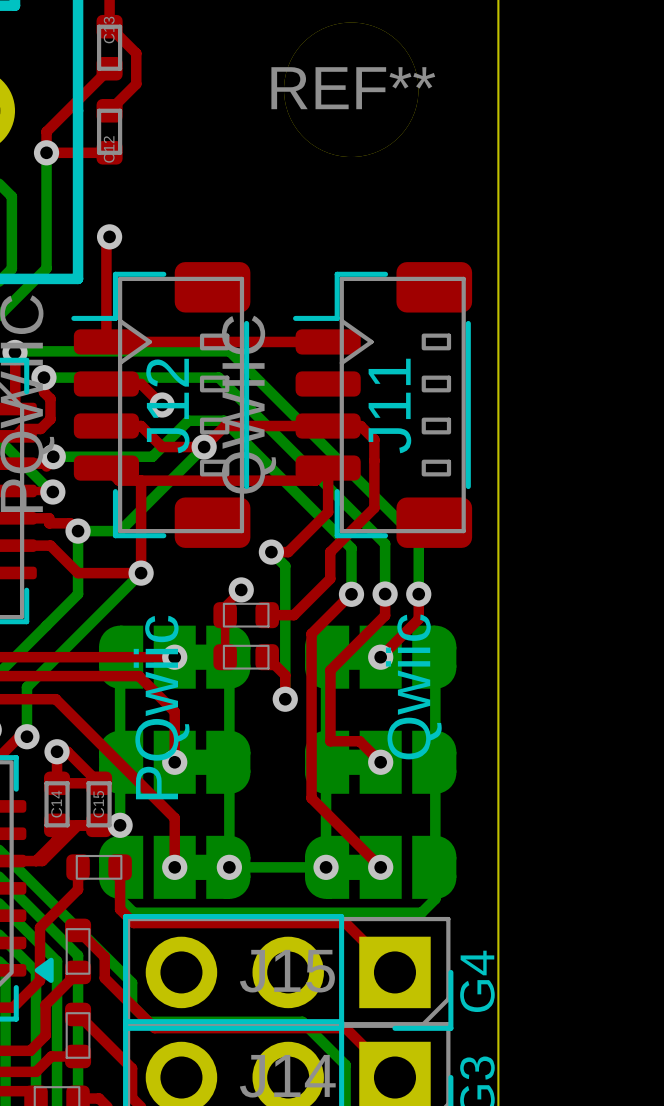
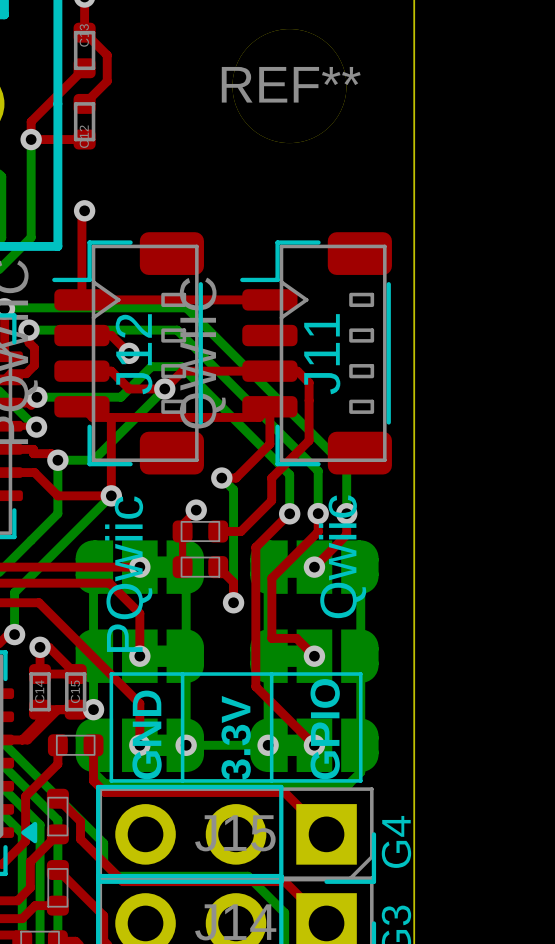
text position: Qwiic (413, 686) -> Qwiic (342, 556)
text position: PQwiic (161, 707) -> PQwiic (128, 574)
line: none -> (111, 674) (360, 674) (360, 780) (111, 780) (111, 674)
line: none -> (182, 674) (182, 780)
line: none -> (271, 674) (271, 780)
text: none -> GPIO (325, 729)
text: none -> GND (147, 734)
text: none -> 3.3V (236, 737)

